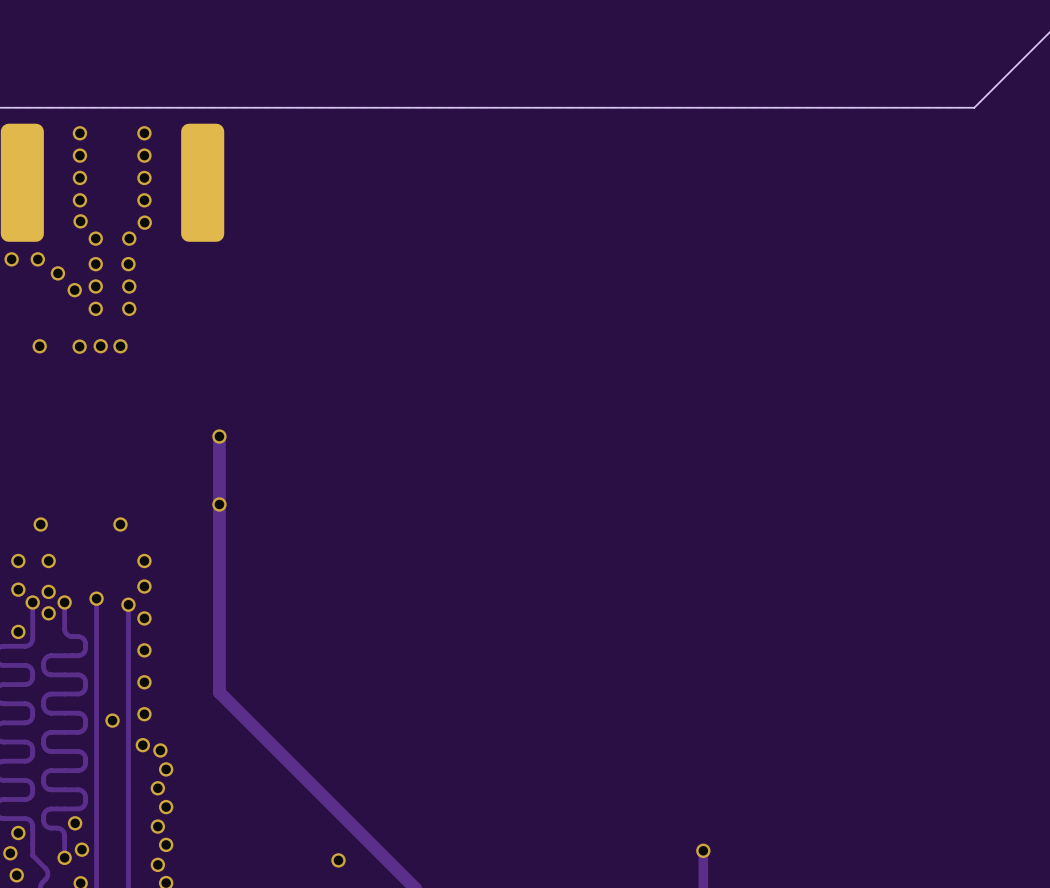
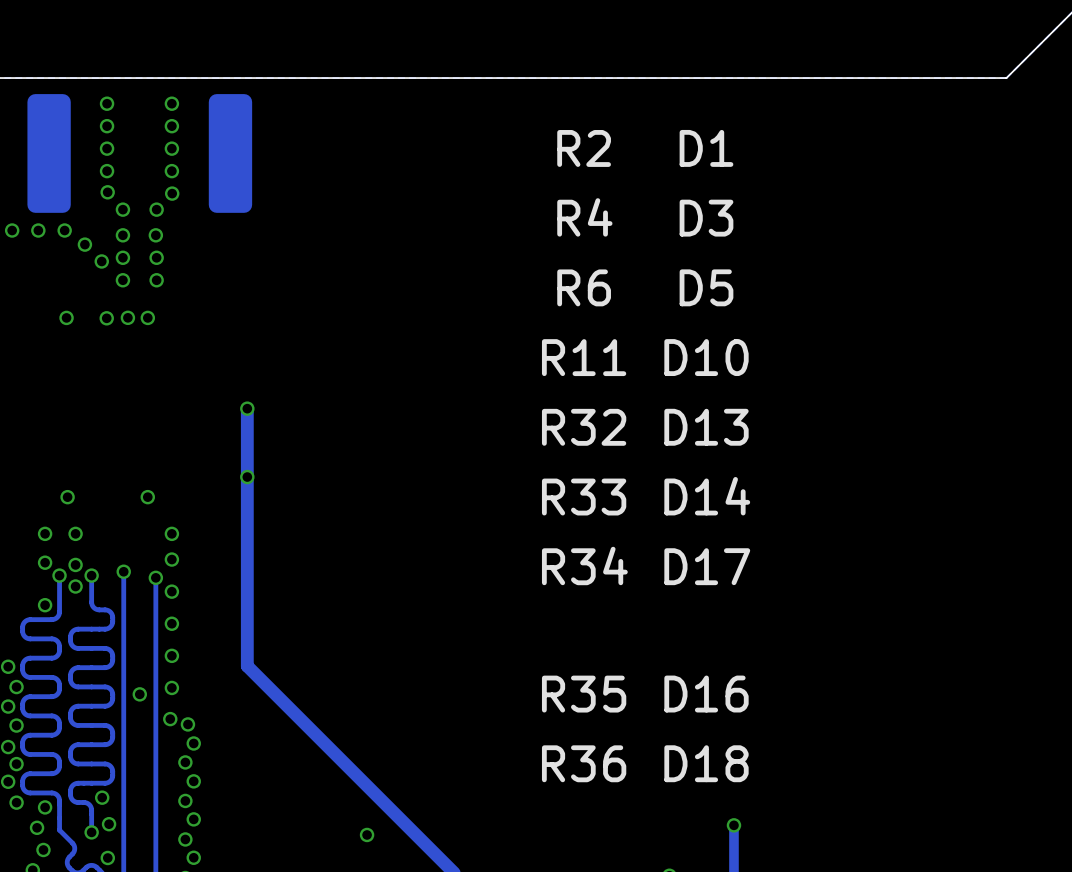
R2: none -> (584, 148)
D1: none -> (706, 148)
R4: none -> (584, 217)
D3: none -> (706, 218)
R6: none -> (584, 287)
D5: none -> (706, 287)
R11: none -> (584, 357)
D10: none -> (706, 357)
R32: none -> (584, 427)
D13: none -> (706, 427)
D14: none -> (707, 496)
R33: none -> (584, 497)
R34: none -> (584, 565)
D17: none -> (707, 566)
R35: none -> (584, 694)
D16: none -> (706, 694)
R36: none -> (584, 763)
D18: none -> (706, 763)

